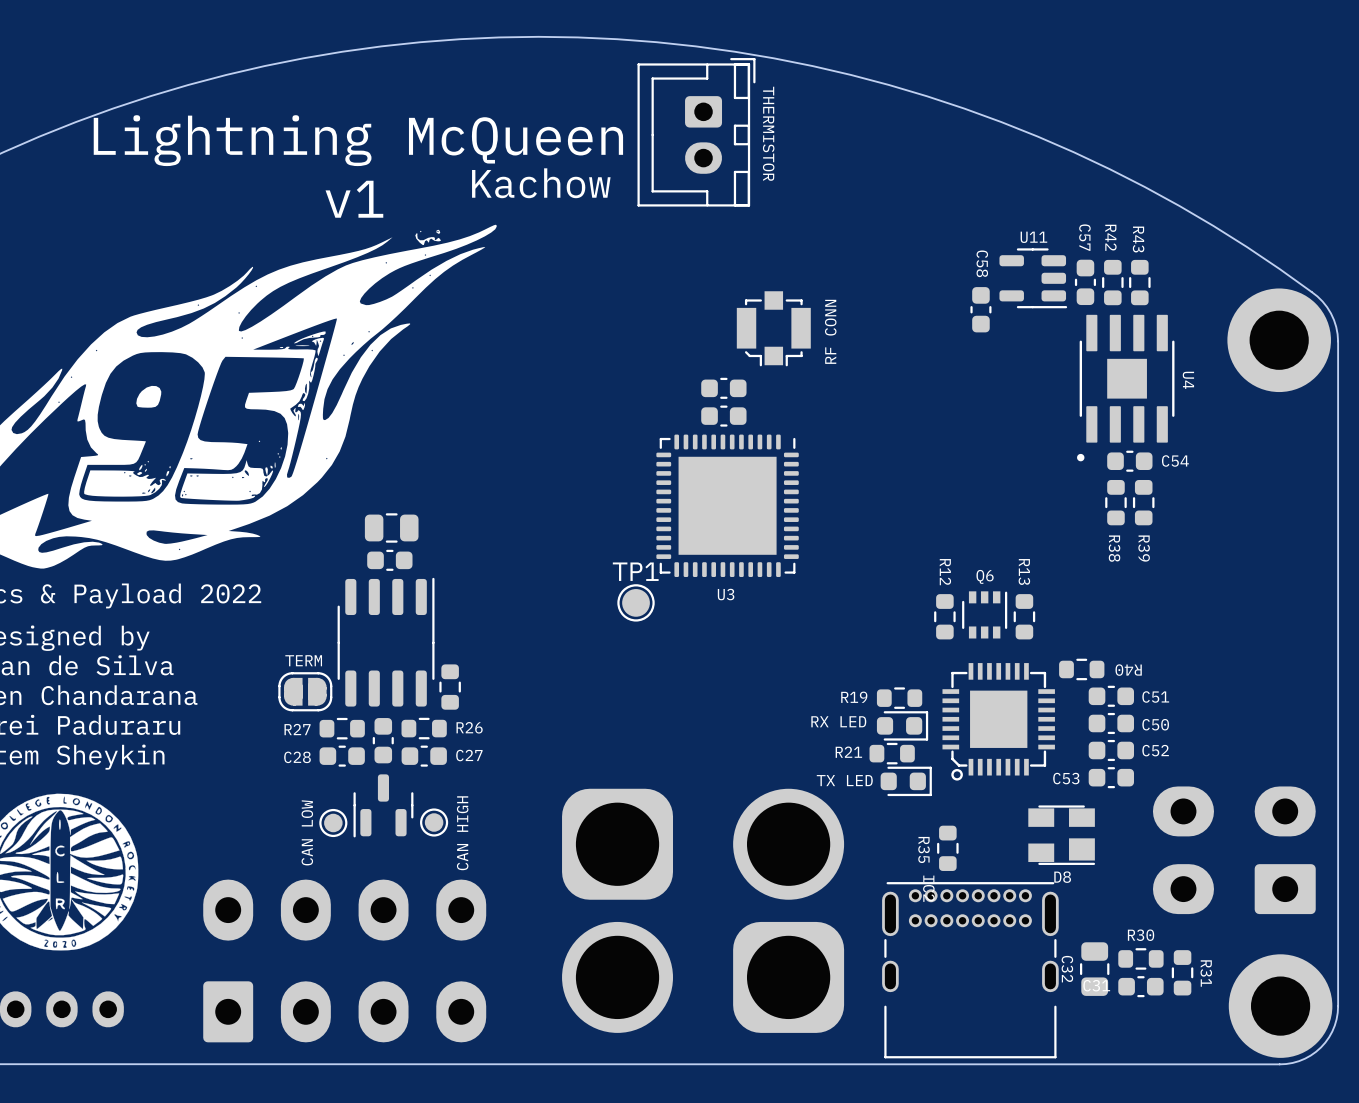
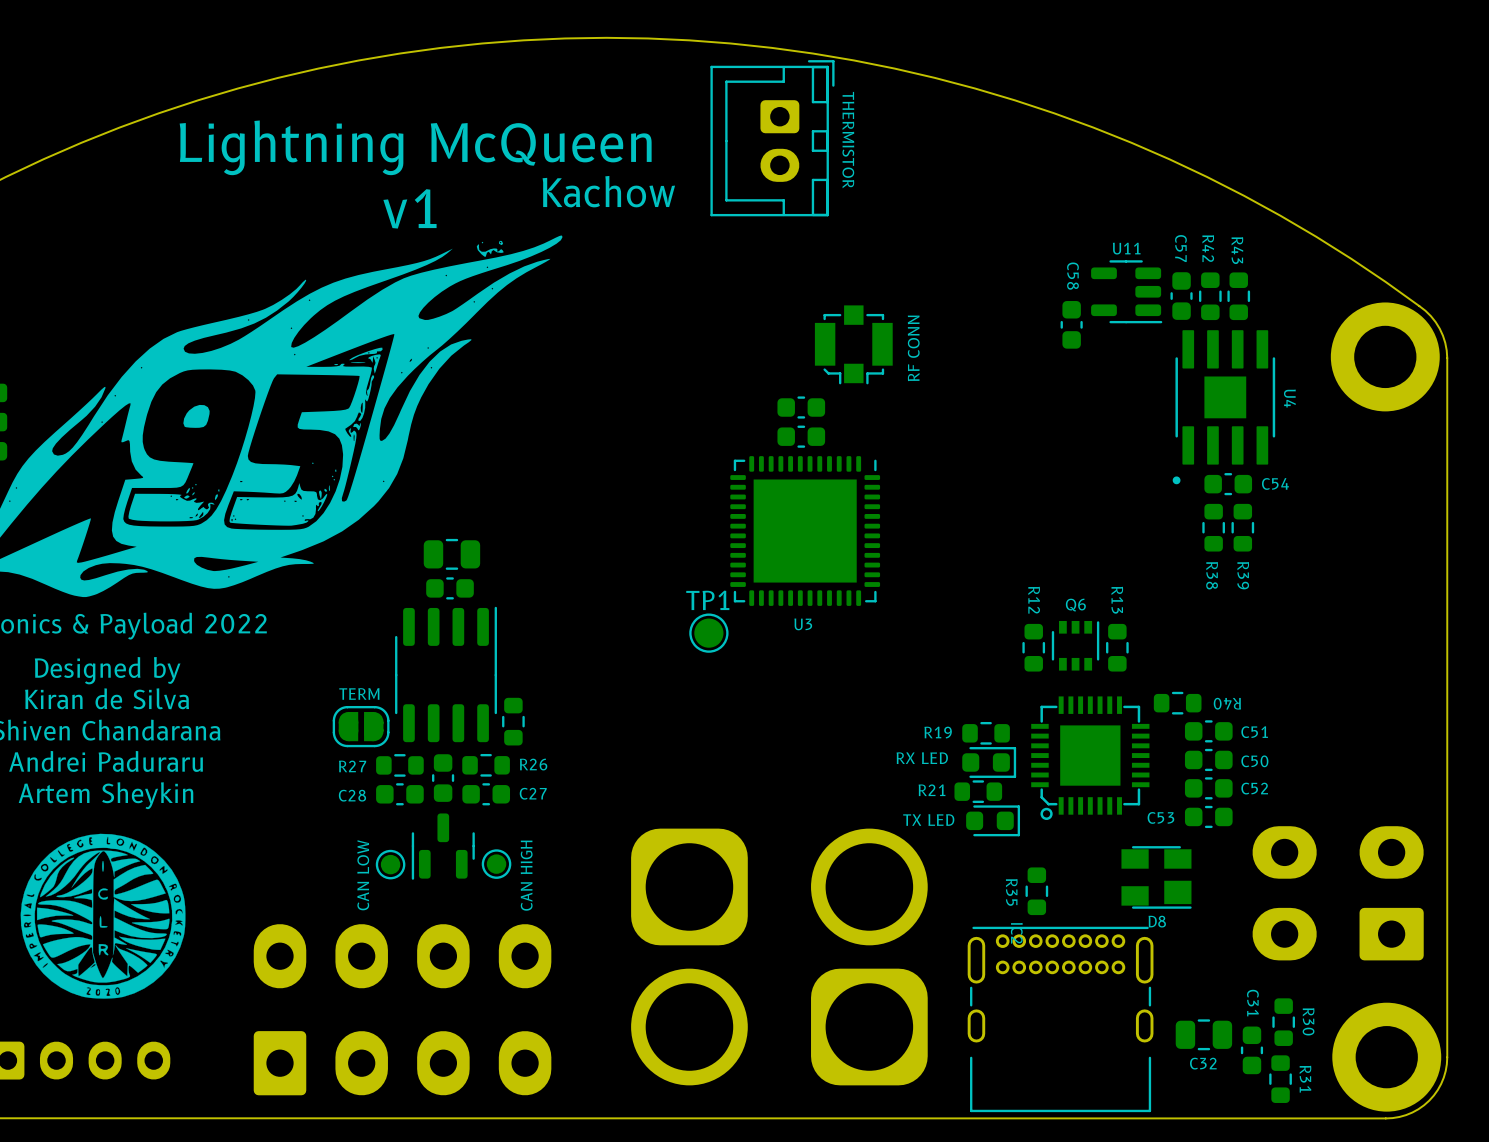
R30: (1140, 958) -> none
C32 name position: C32 (1067, 969) -> C32 (1203, 1063)
C32 rotation: 0° (1094, 969) -> 90° clockwise (1203, 1034)
R31 name: R31 (1206, 973) -> R30 (1308, 1021)
C31 rotation: 0° (1140, 986) -> 90° clockwise (1251, 1050)
R31: none -> (1280, 1079)

